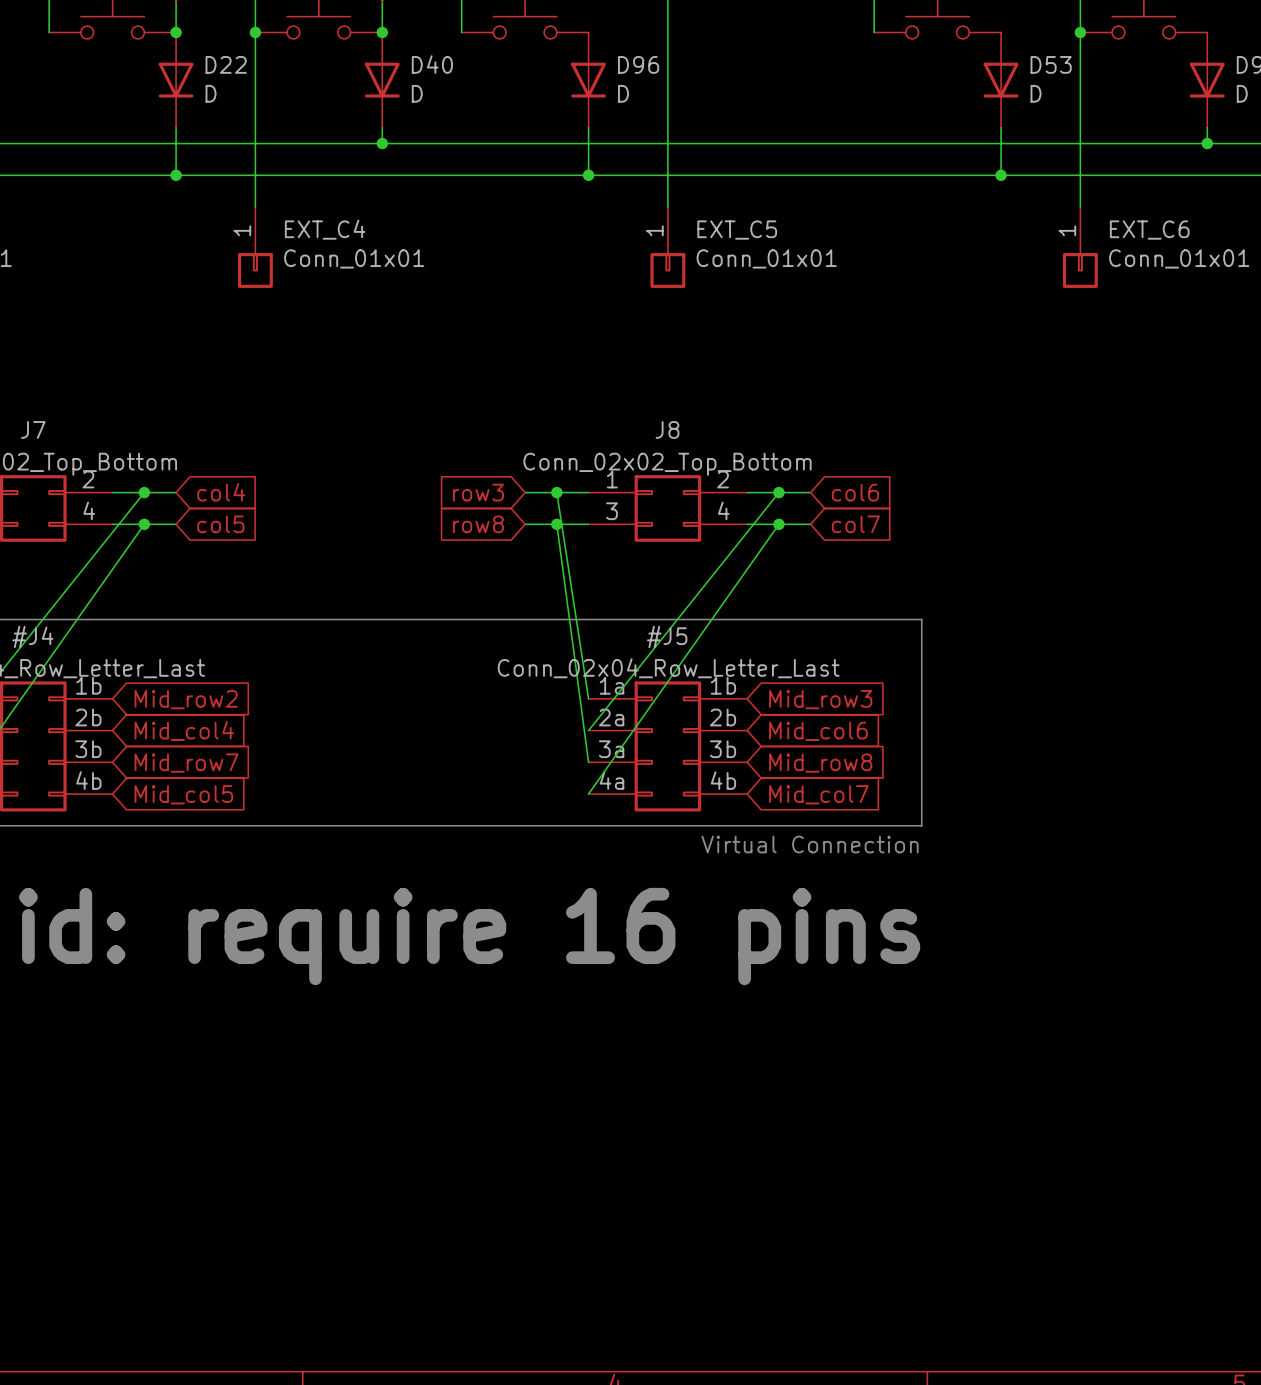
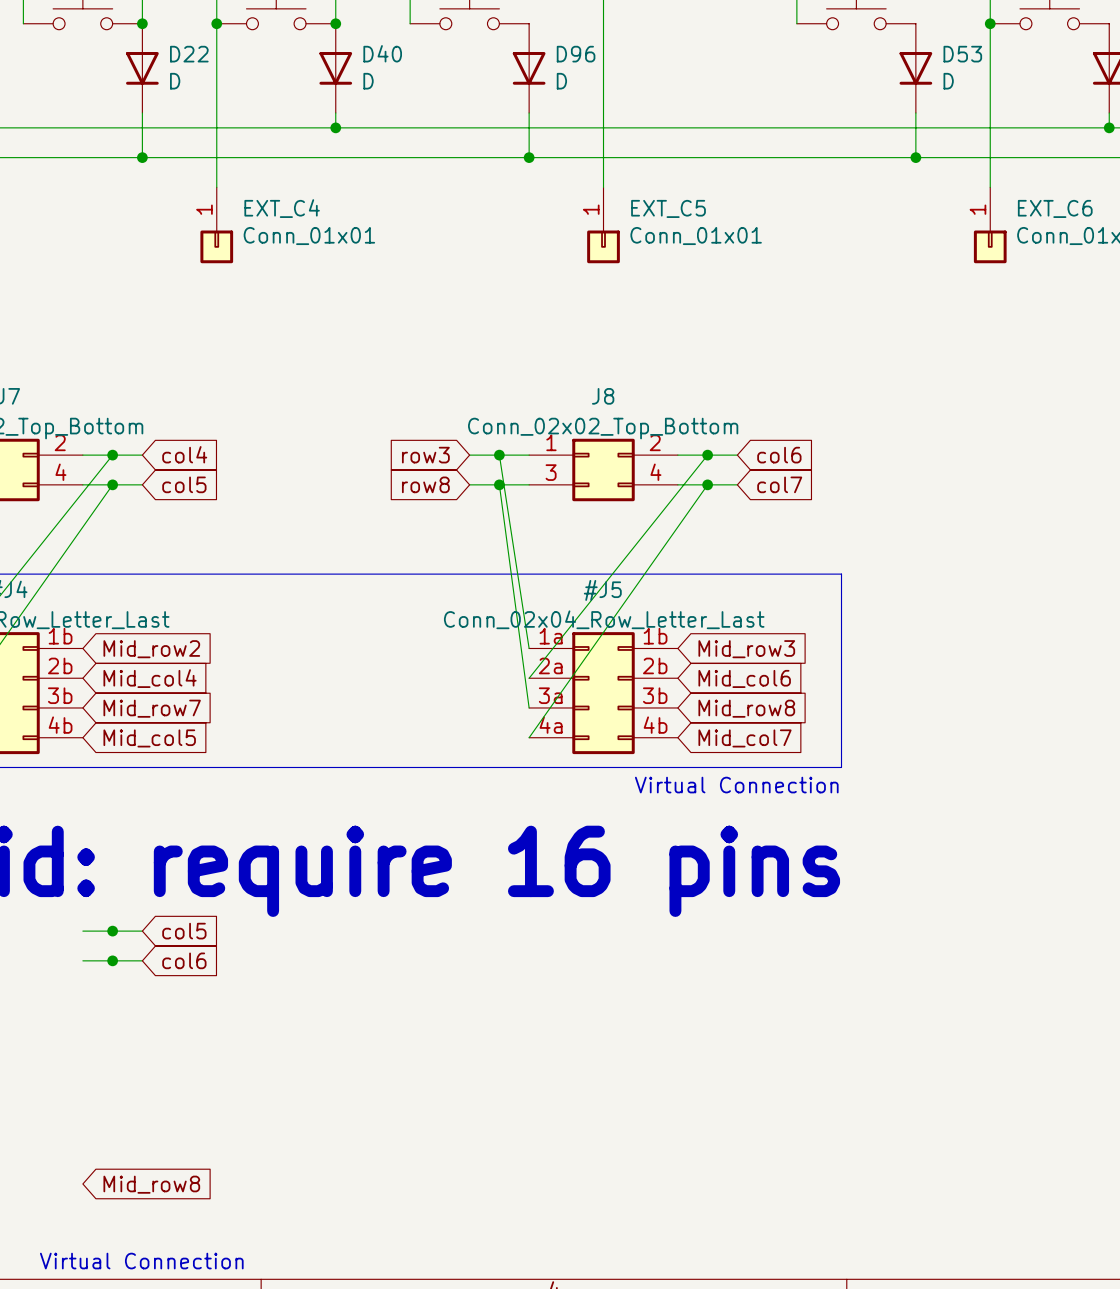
wire: none -> (82, 931) (142, 931)
junction: none -> (112, 931)
global label: none -> col5 (184, 931)
wire: none -> (82, 960) (142, 960)
junction: none -> (112, 960)
global label: none -> col6 (184, 960)
global label: none -> Mid_row8 (151, 1184)
text: none -> Virtual Connection (141, 1261)

